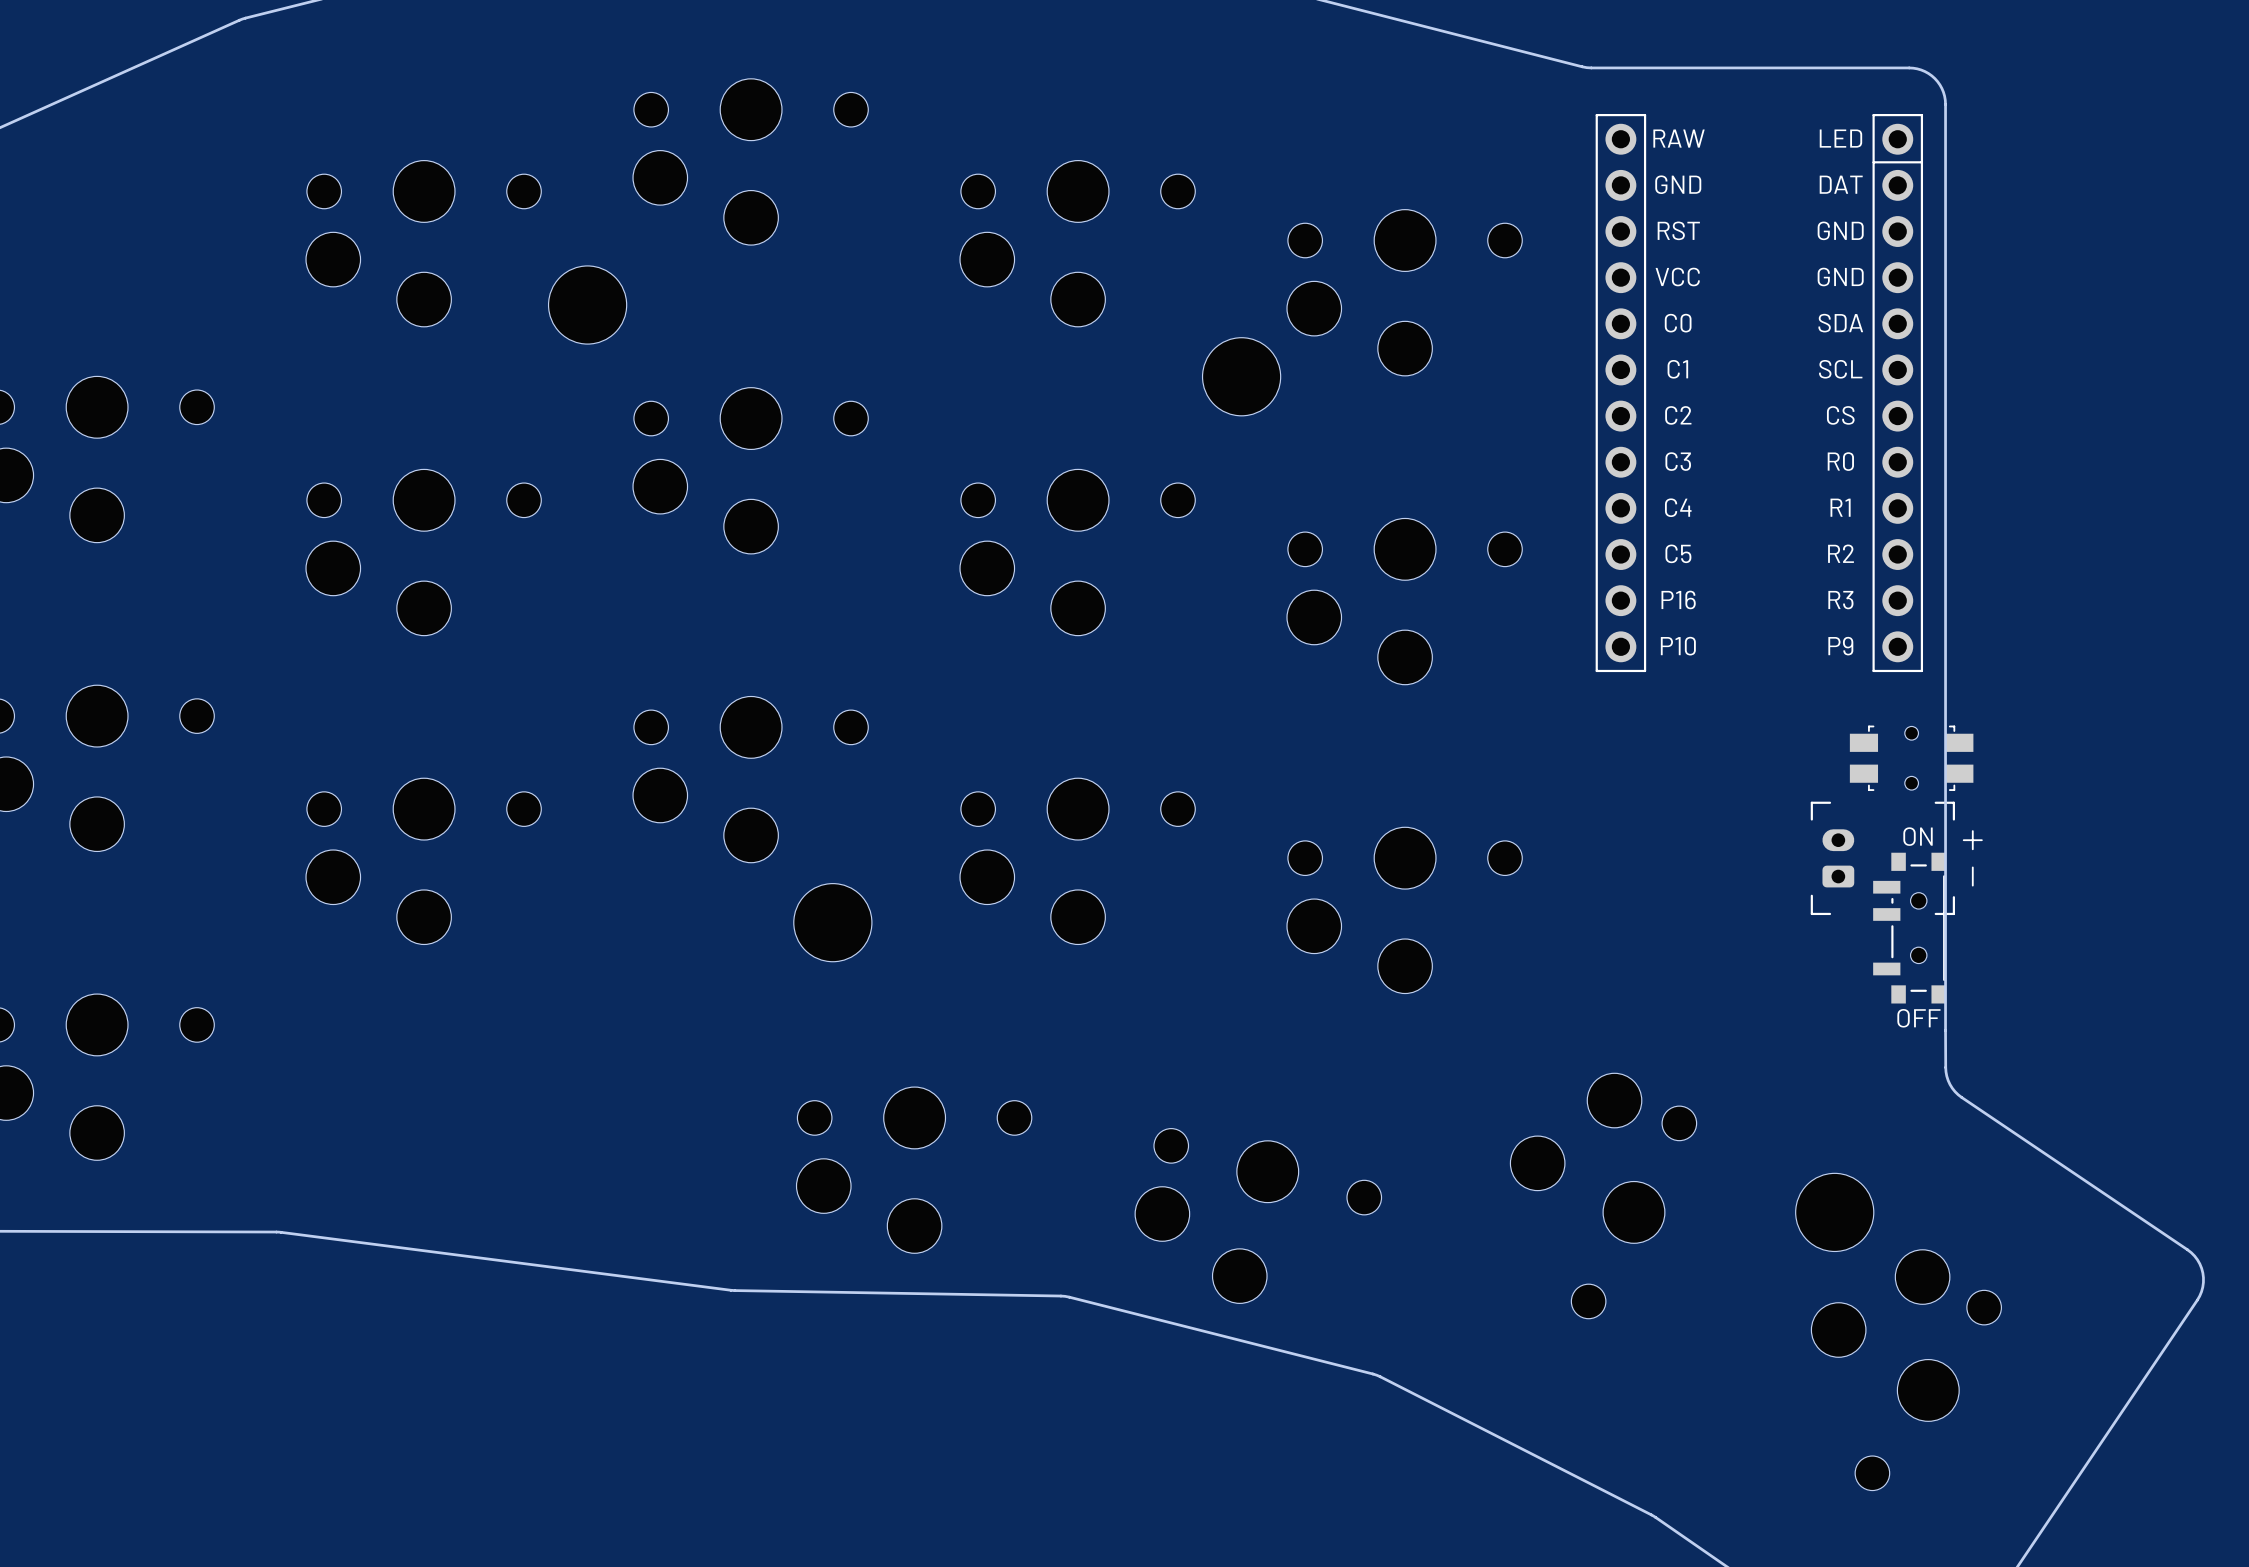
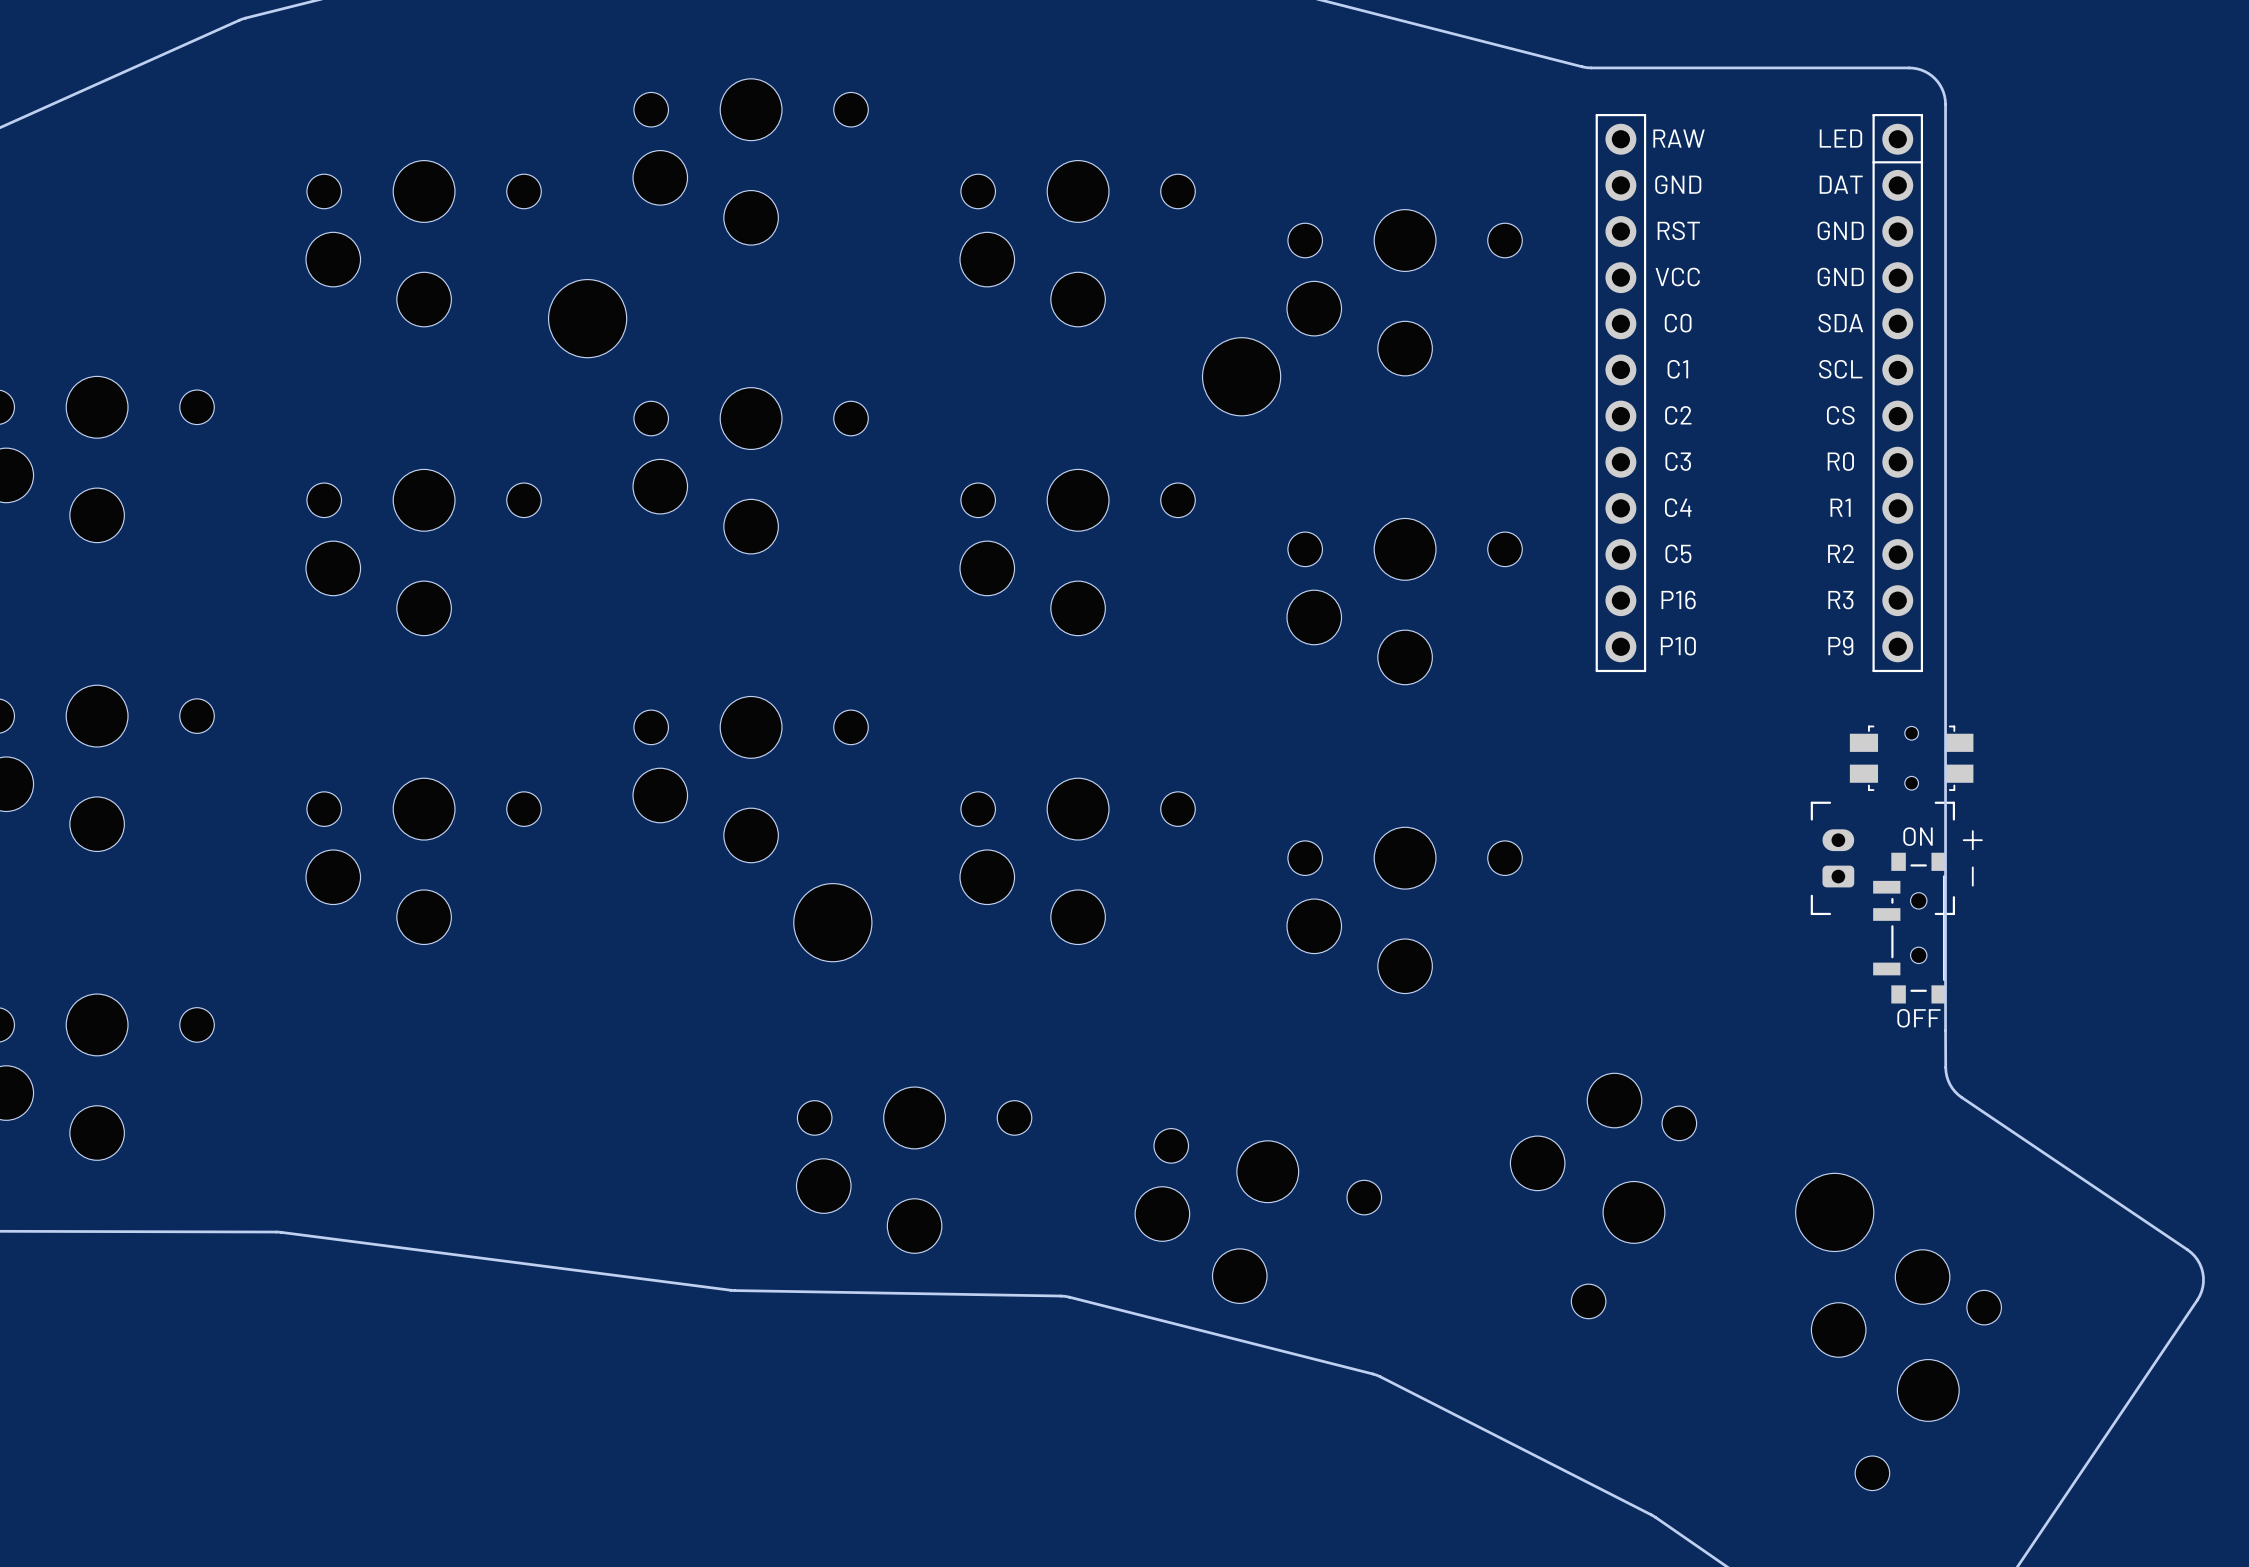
part position: (587, 305) -> (587, 318)

